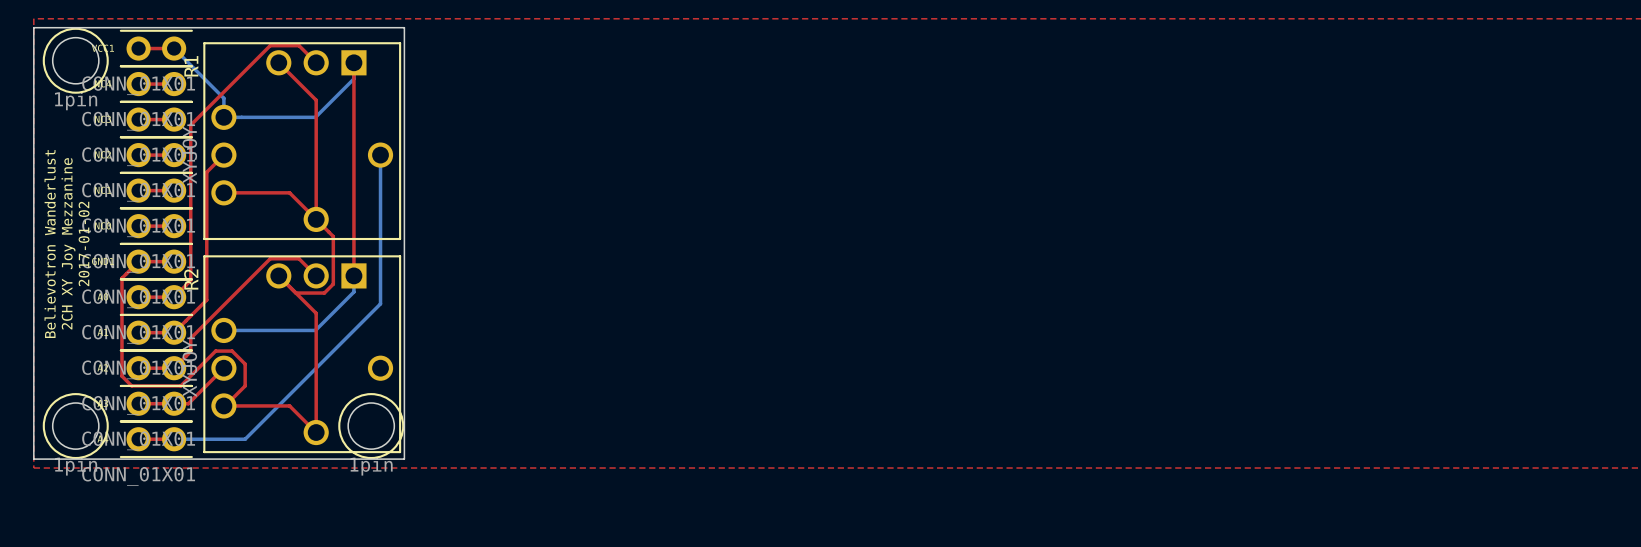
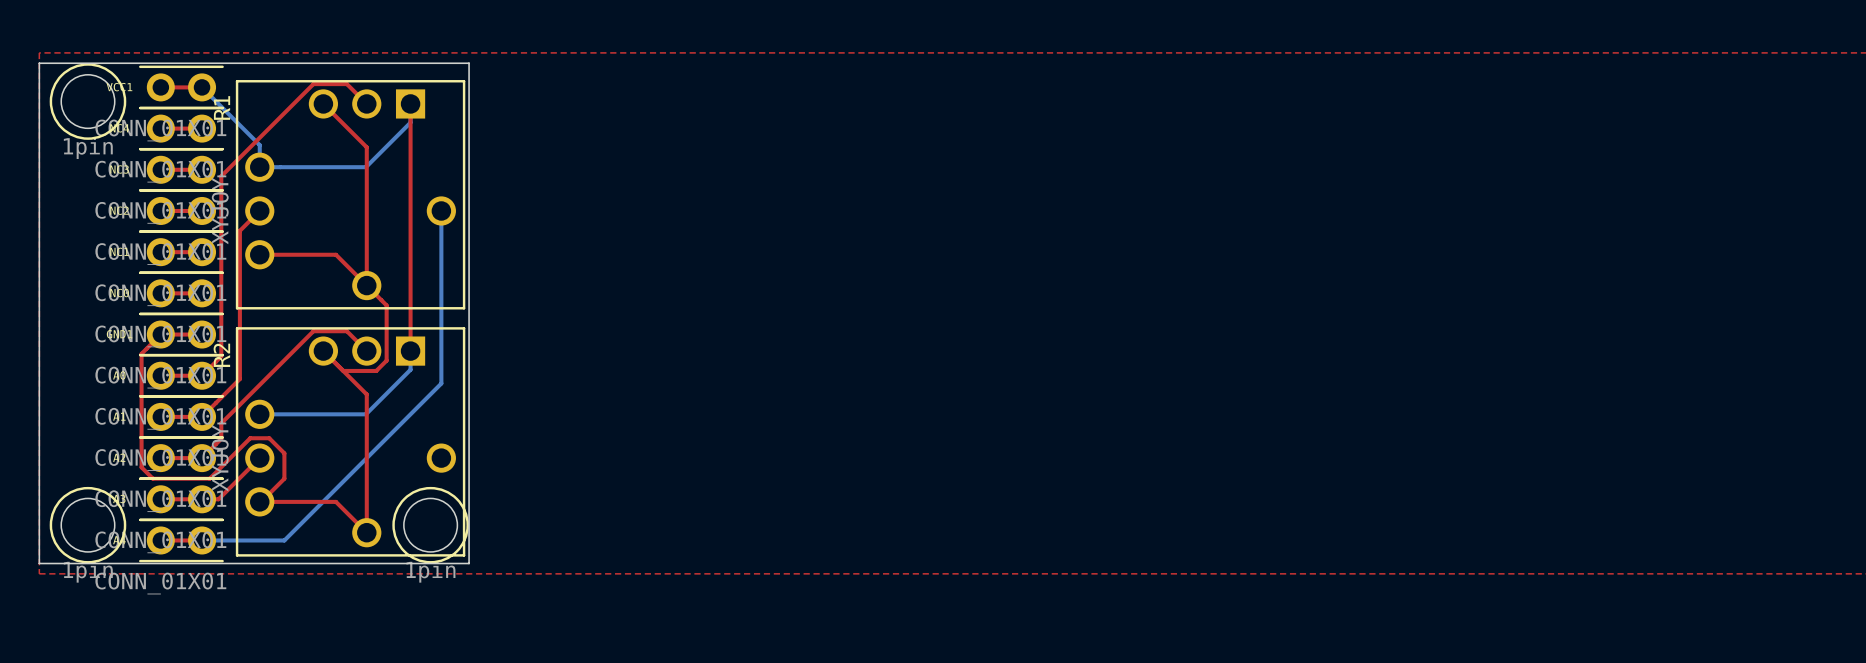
text: 2CH XY Joy Mezzanine (68, 243) -> none
text: 2017-01-02 (84, 243) -> none
text: Believotron Wanderlust (50, 244) -> none

